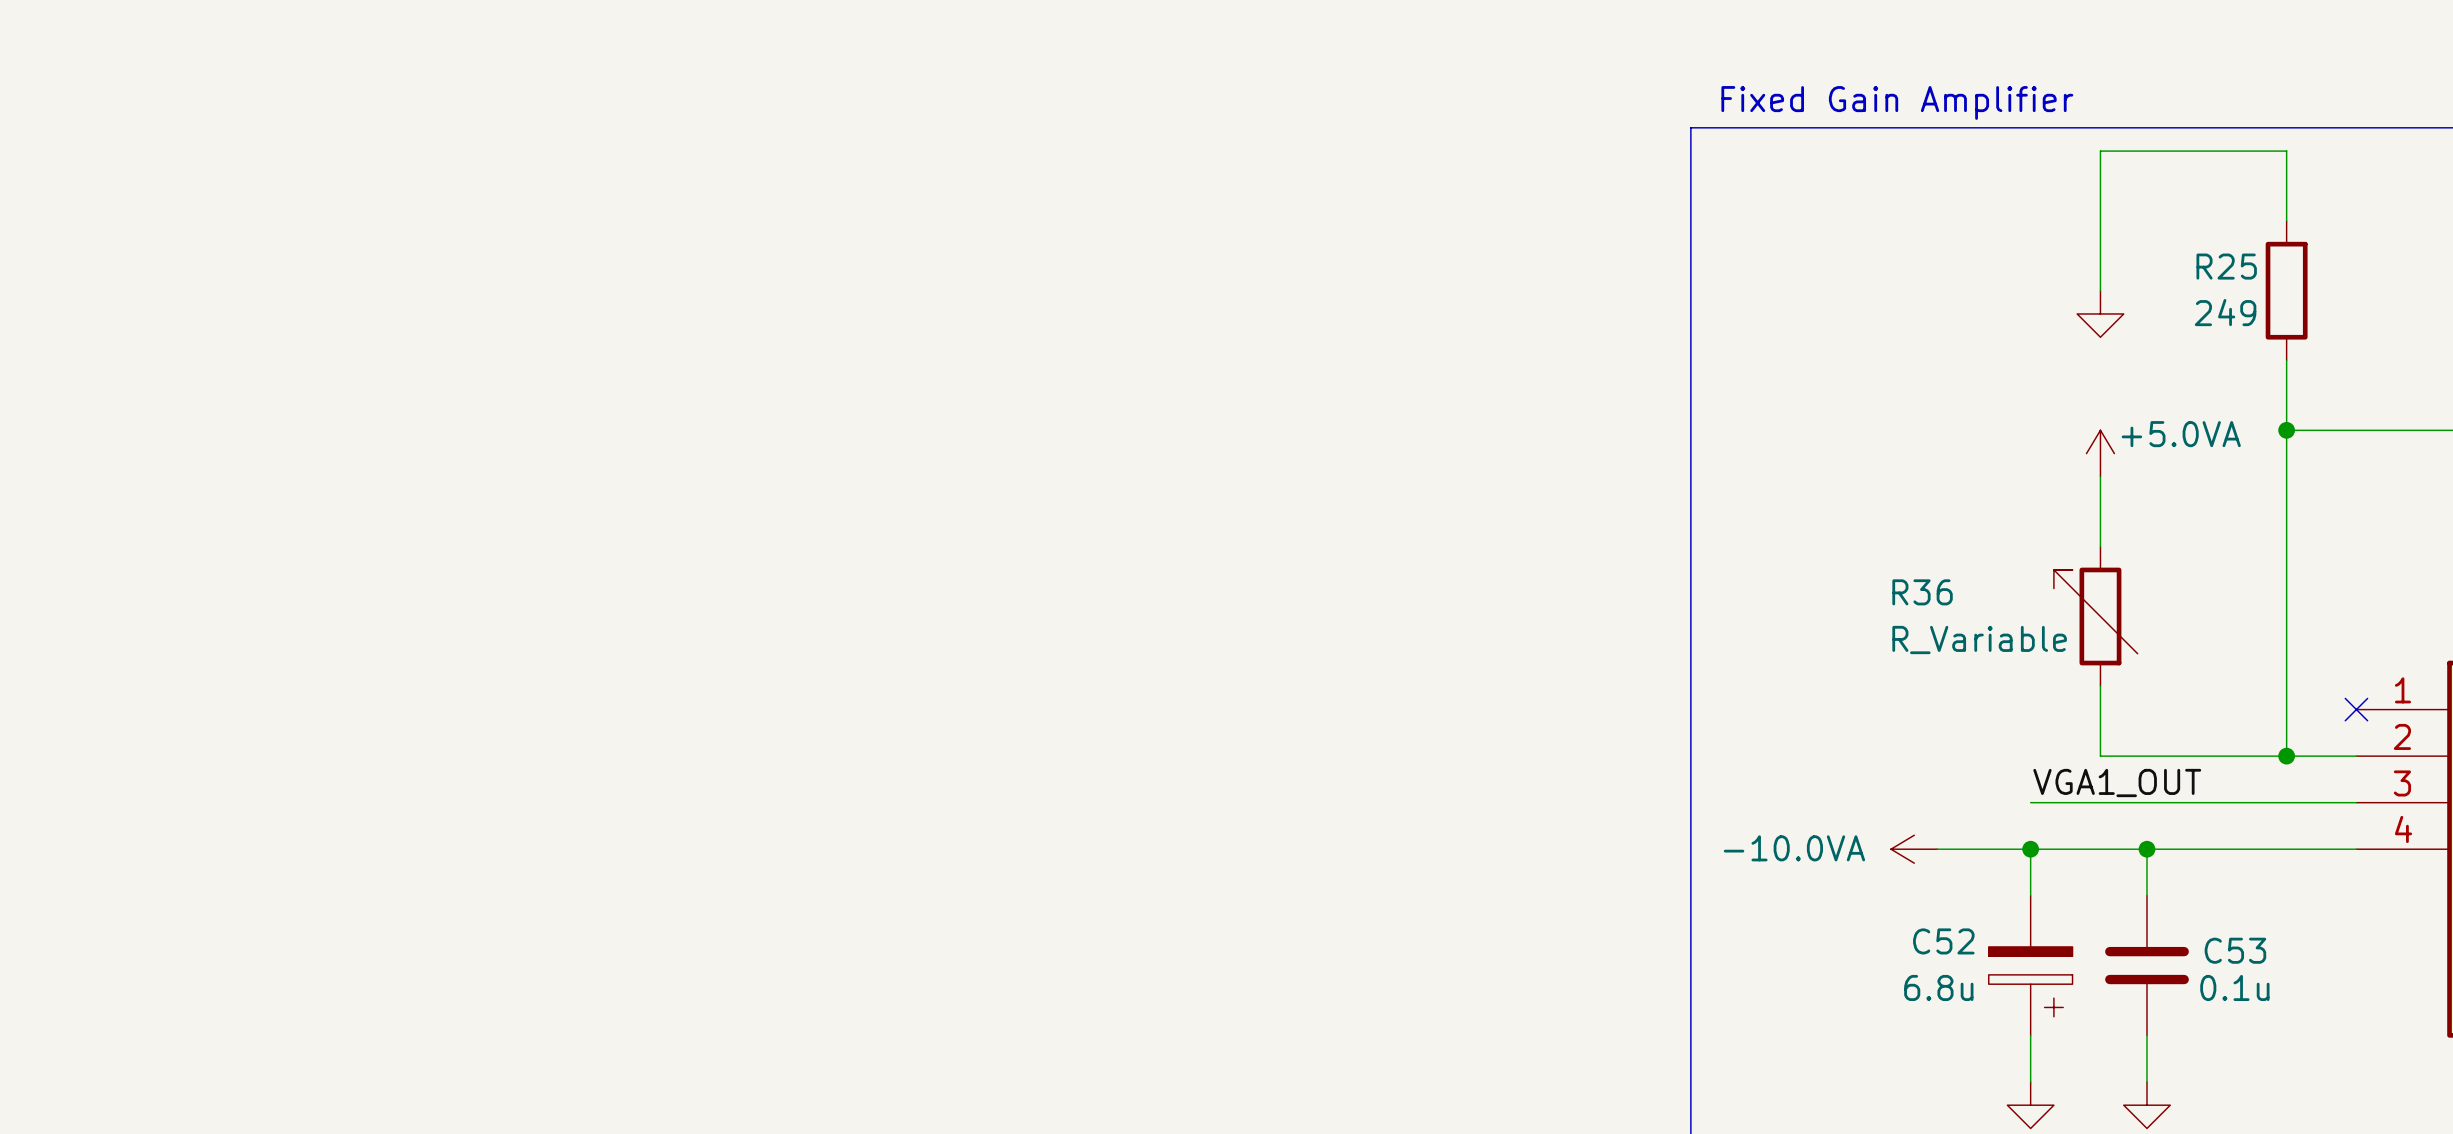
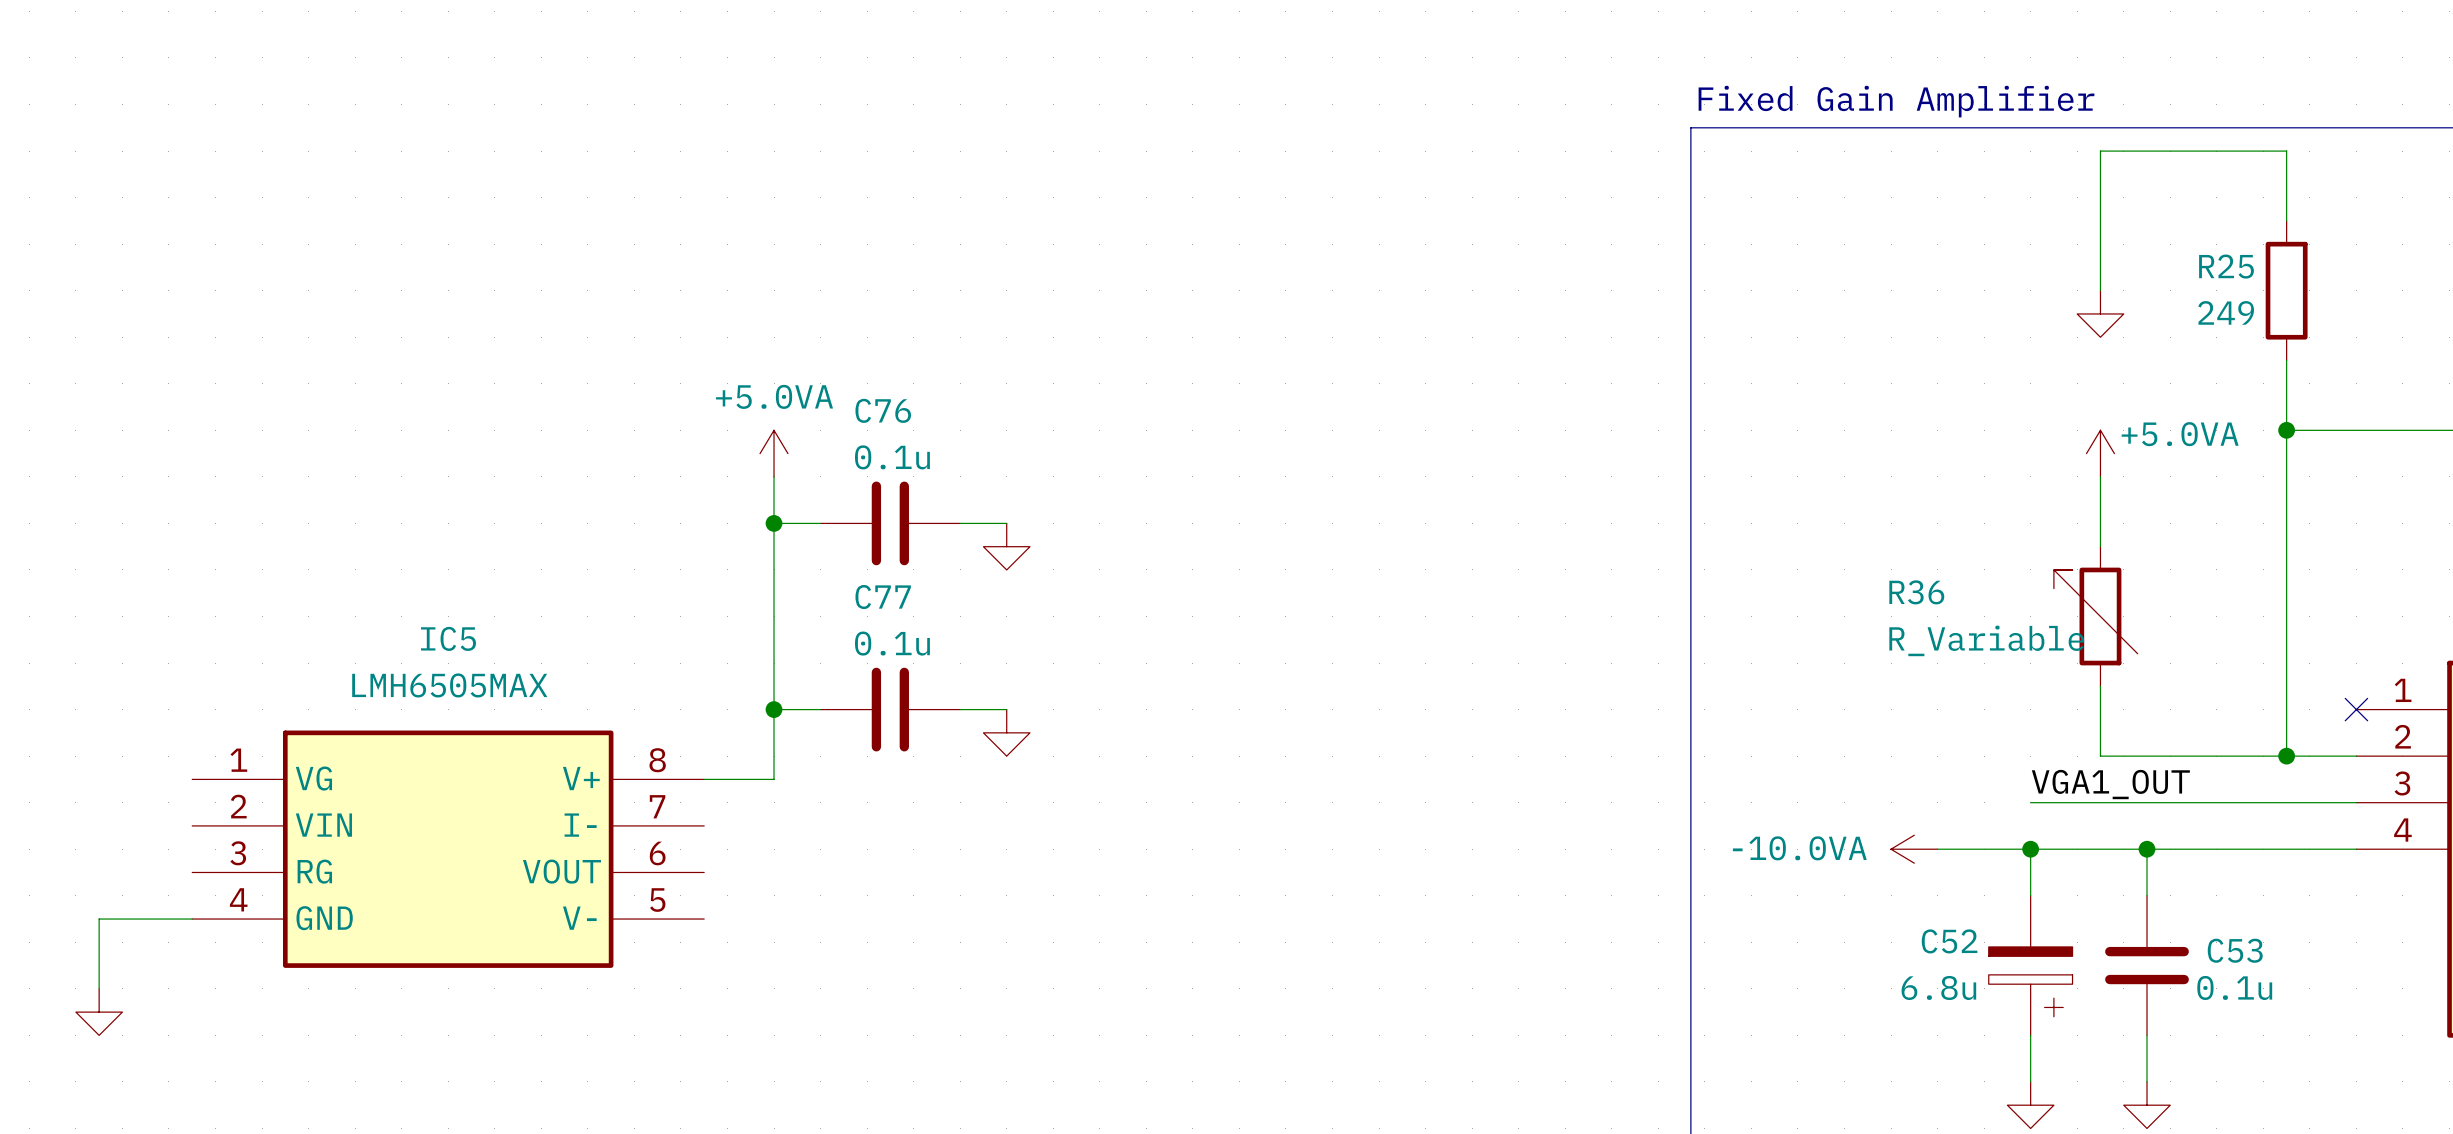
power symbol: none -> +5.0VA (774, 453)
wire: none -> (774, 476) (774, 779) (704, 779)
wire: none -> (774, 523) (820, 523)
junction: none -> (774, 523)
C76: none -> 0.1u (890, 523)
wire: none -> (960, 523) (1006, 523)
power symbol: none -> (1006, 546)
wire: none -> (774, 709) (820, 709)
junction: none -> (774, 709)
C77: none -> 0.1u (890, 709)
wire: none -> (960, 709) (1006, 709)
power symbol: none -> (1006, 732)
IC5: none -> LMH6505MAX (448, 849)
wire: none -> (192, 919) (99, 919) (99, 988)
power symbol: none -> (99, 1012)

